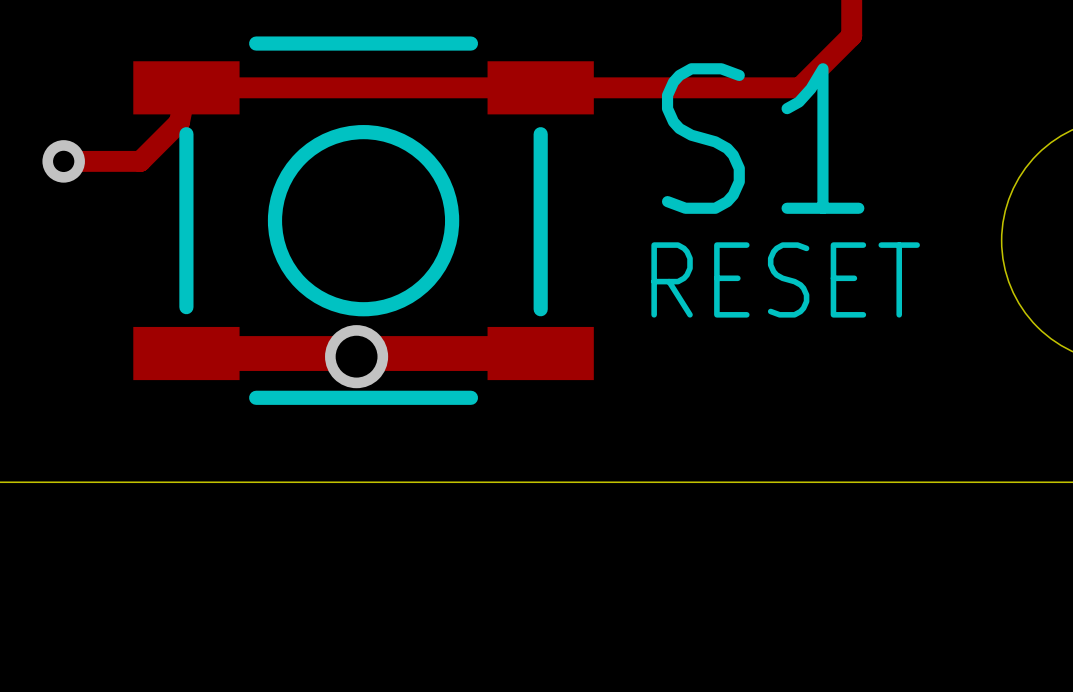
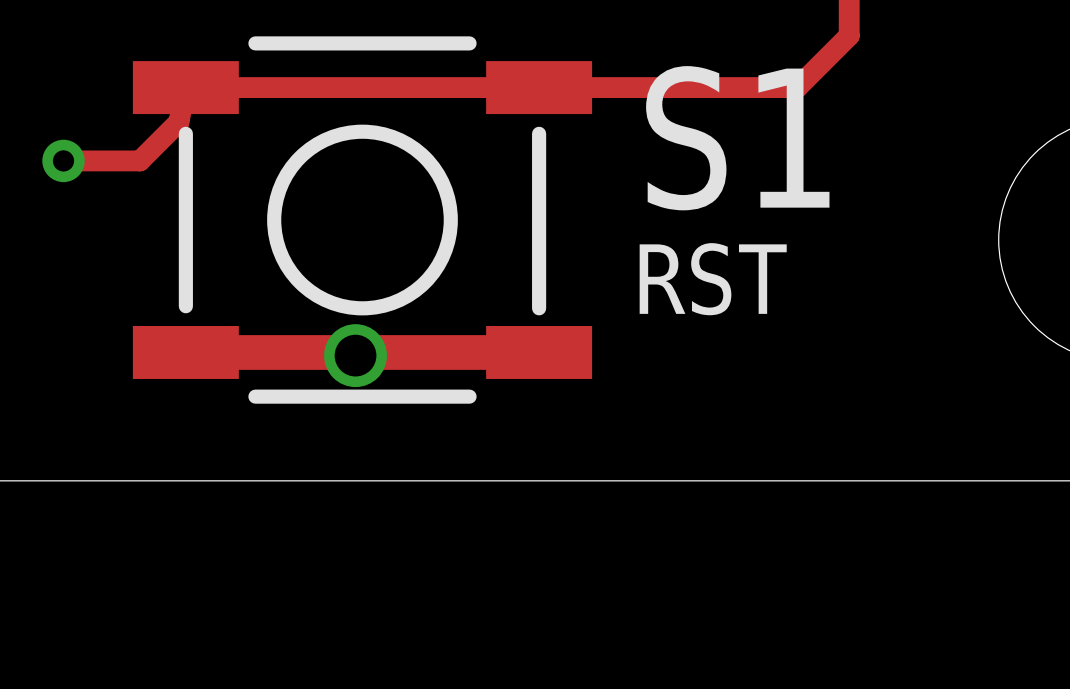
text: RESET (785, 279) -> RST (713, 279)

